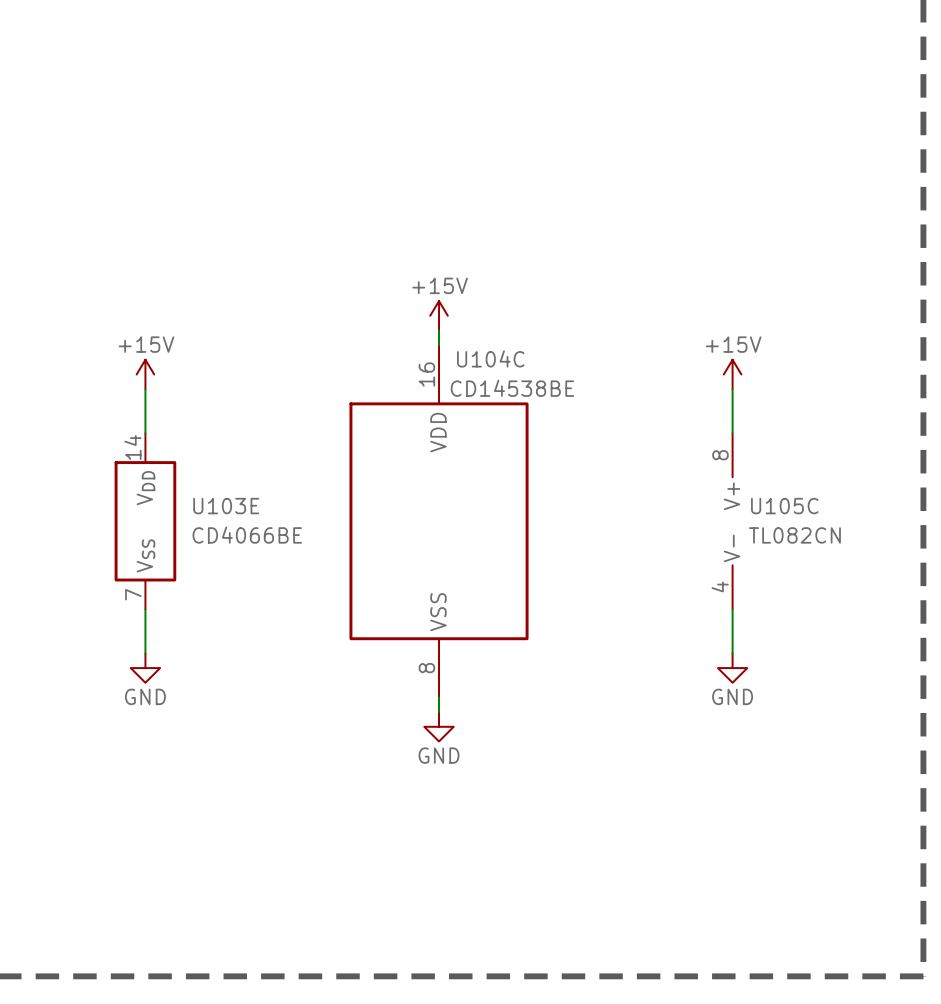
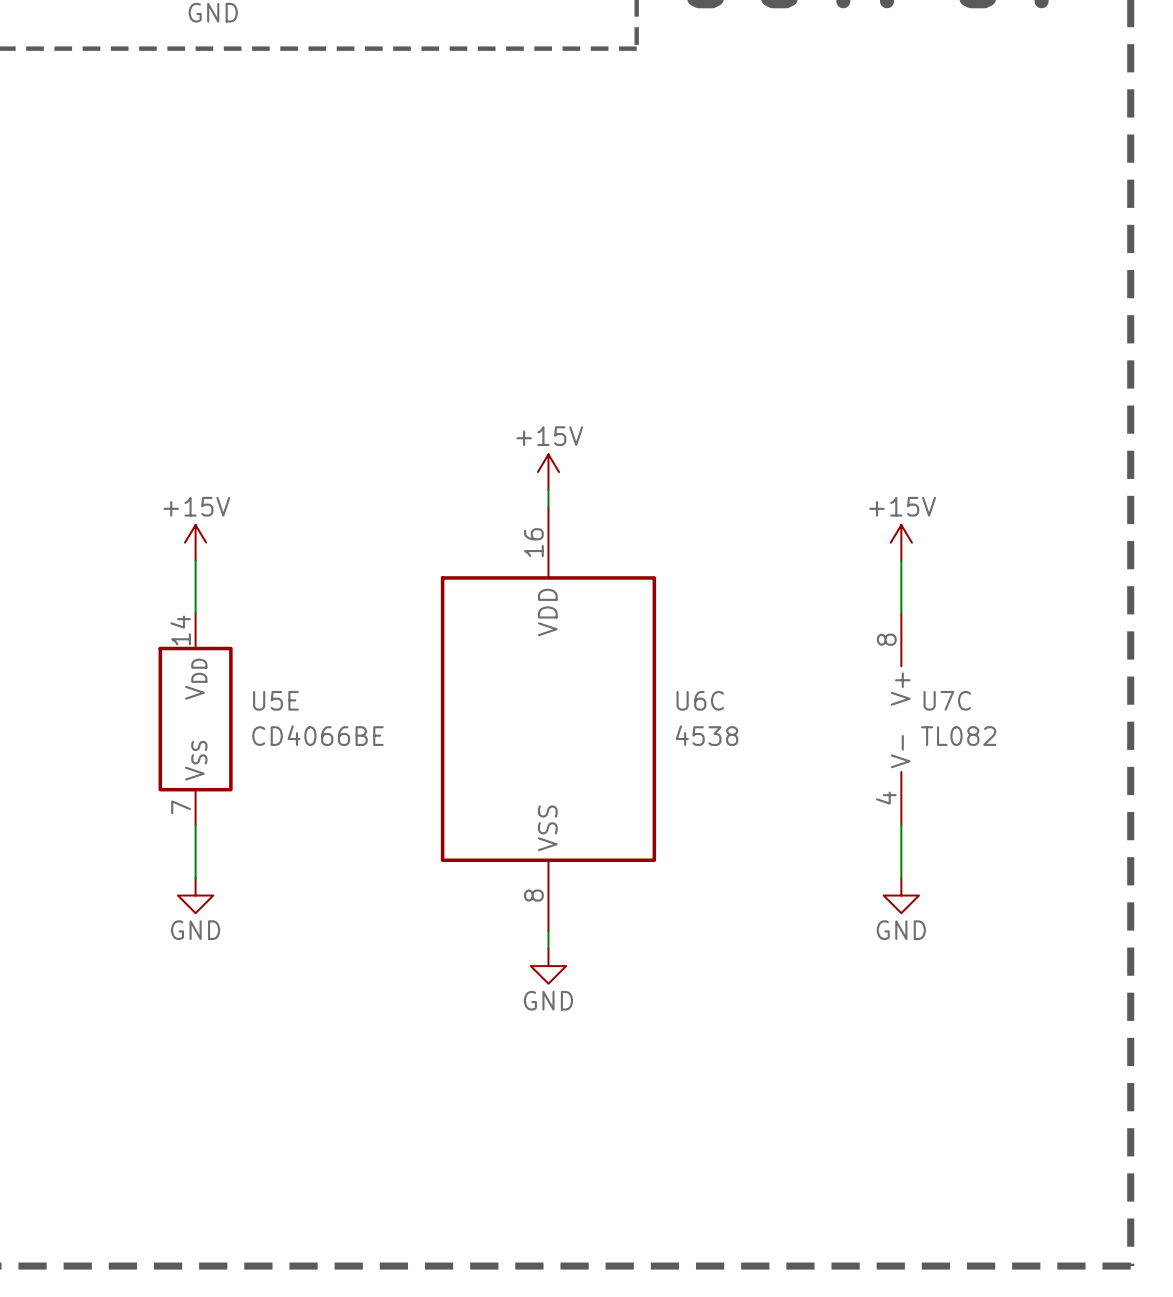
U104C name: U104C (490, 358) -> U6C (700, 700)
U104C value: CD14538BE (512, 388) -> 4538 (706, 735)
U103E name: U103E (226, 506) -> U5E (275, 700)
U105C name: U105C (784, 506) -> U7C (947, 700)
U105C value: TL082CN (794, 535) -> TL082 (958, 736)

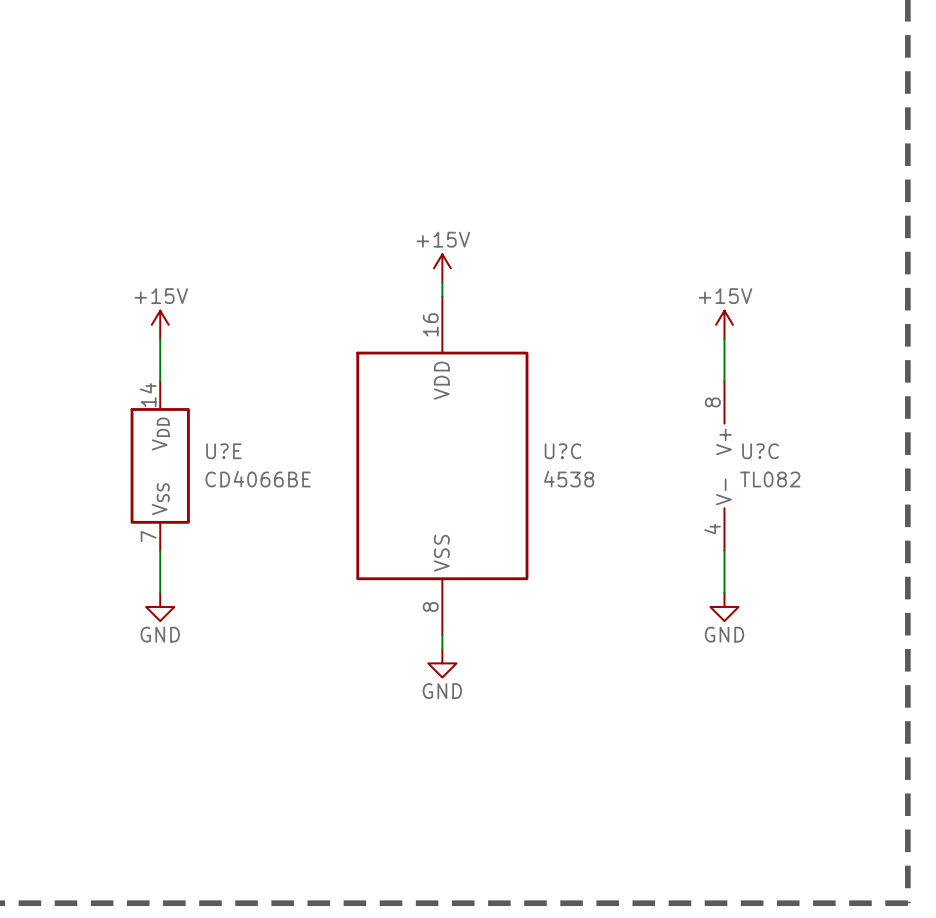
U5E name: U5E (275, 700) -> U?E (223, 451)
U6C name: U6C (700, 700) -> U?C (563, 451)
U7C name: U7C (947, 700) -> U?C (760, 451)

